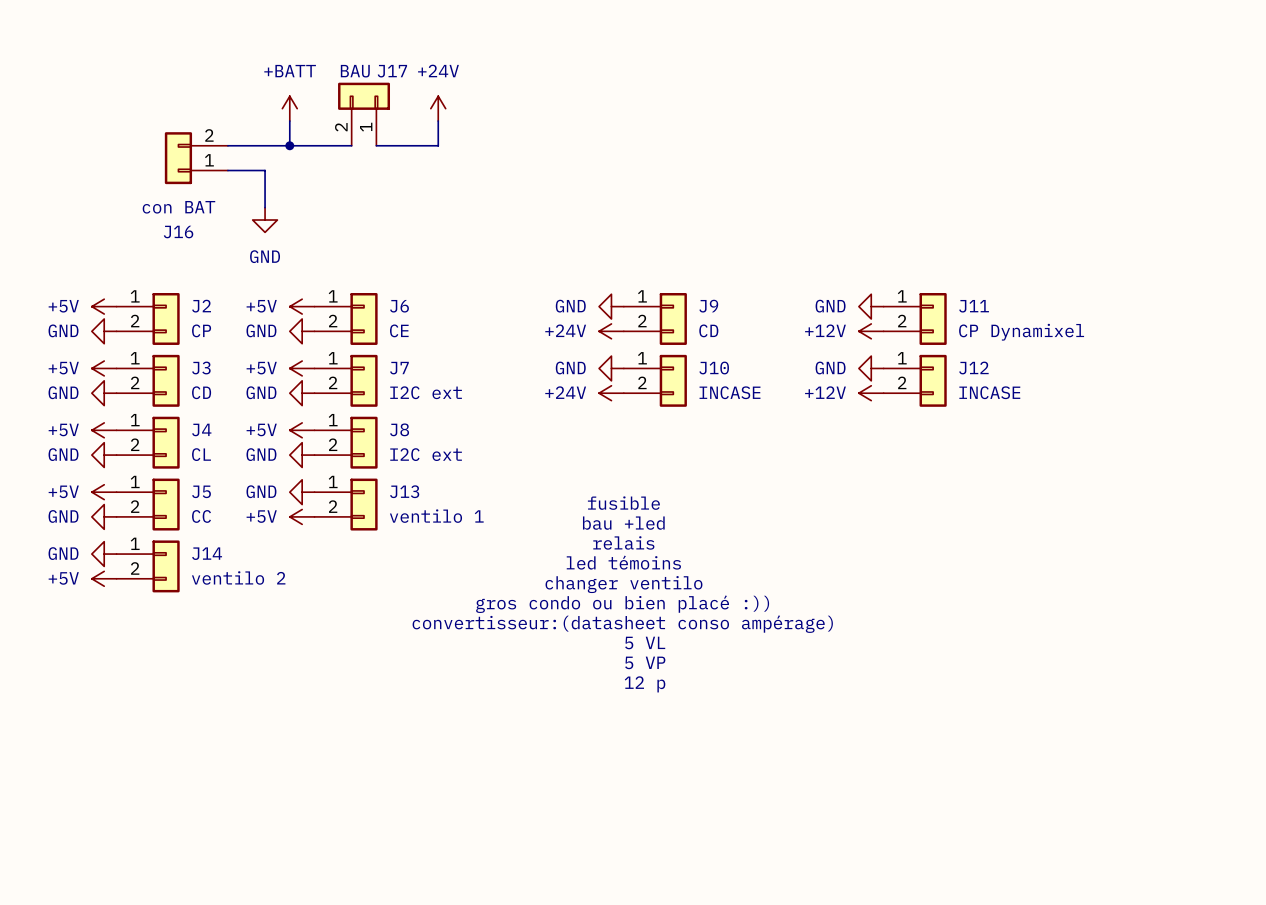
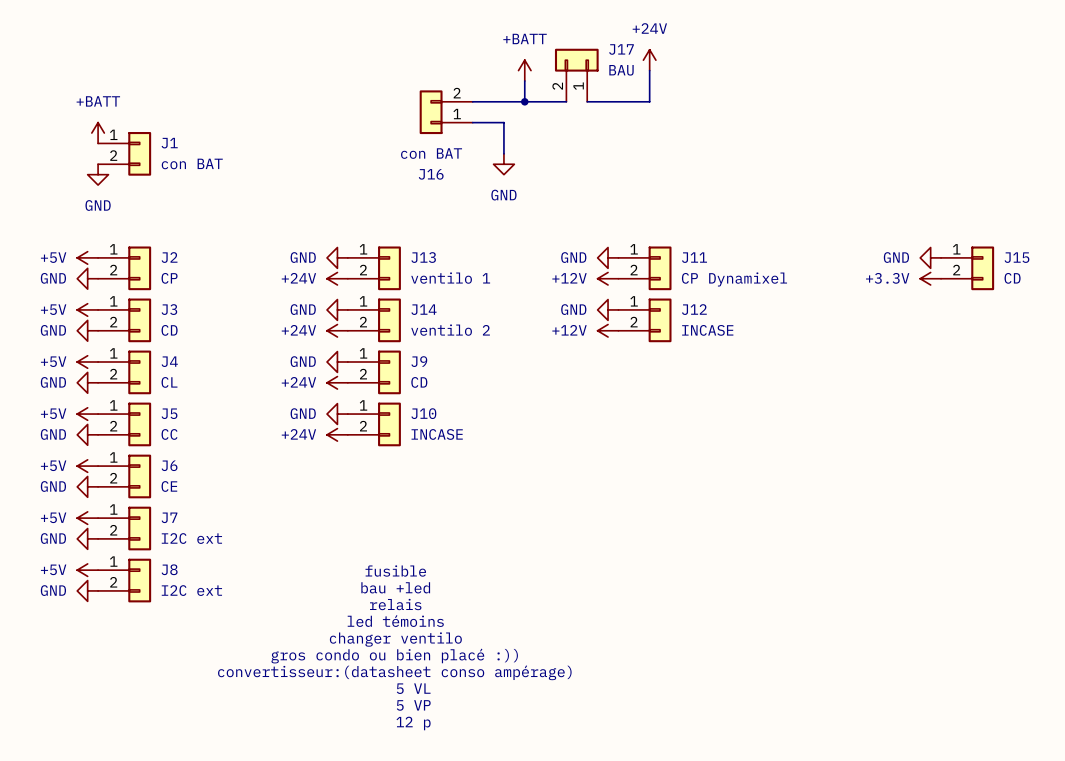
J17 value position: BAU (355, 71) -> BAU (621, 70)
J17 name position: J17 (392, 71) -> J17 (621, 49)
power symbol: none -> +24V (649, 60)
power symbol: none -> +BATT (524, 70)
wire: none -> (649, 70) (649, 101) (587, 101)
wire: none -> (524, 81) (524, 101)
power symbol: +BATT (289, 108) -> none
power symbol: +24V (438, 108) -> none
J17 position: (364, 114) -> (576, 75)
wire: (289, 121) (289, 145) -> none
wire: (438, 121) (438, 145) (376, 145) -> none
wire: none -> (472, 101) (566, 101)
junction: none -> (524, 101)
wire: (227, 145) (351, 145) -> none
junction: (289, 145) -> none
wire: none -> (472, 122) (503, 122) (503, 153)
power symbol: none -> +BATT (98, 133)
J16 position: (196, 158) -> (446, 112)
wire: (227, 170) (265, 170) (265, 207) -> none
J1: none -> con BAT (124, 153)
power symbol: none -> GND (503, 164)
power symbol: none -> GND (98, 174)
power symbol: GND (265, 220) -> none
power symbol: +5V (302, 306) -> none
power symbol: none -> GND (337, 257)
power symbol: GND (611, 306) -> none
power symbol: none -> GND (608, 257)
power symbol: GND (871, 306) -> none
power symbol: none -> GND (930, 257)
J6: CE (346, 318) -> none
J9 position: (655, 318) -> (374, 372)
J11 position: (915, 318) -> (644, 268)
J15: none -> CD (967, 268)
power symbol: GND (302, 331) -> none
power symbol: none -> +24V (337, 278)
power symbol: +24V (611, 331) -> none
power symbol: none -> +12V (608, 278)
power symbol: +12V (871, 331) -> none
power symbol: none -> +3.3V (930, 278)
power symbol: +5V (302, 368) -> none
power symbol: none -> GND (337, 309)
power symbol: GND (611, 368) -> none
power symbol: none -> GND (608, 309)
power symbol: GND (871, 368) -> none
J7 position: (346, 380) -> (124, 528)
J14: none -> ventilo 2 (374, 320)
J10 position: (655, 380) -> (374, 424)
J12 position: (915, 380) -> (644, 320)
power symbol: GND (302, 393) -> none
power symbol: none -> +24V (337, 330)
power symbol: +24V (611, 393) -> none
power symbol: none -> +12V (608, 330)
power symbol: +12V (871, 393) -> none
power symbol: +5V (302, 430) -> none
power symbol: none -> GND (337, 361)
J8 position: (346, 442) -> (124, 580)
power symbol: GND (302, 455) -> none
power symbol: none -> +24V (337, 382)
power symbol: GND (302, 492) -> none
power symbol: none -> GND (337, 414)
text position: fusible (623, 503) -> fusible (395, 571)
J13 position: (346, 504) -> (374, 268)
power symbol: +5V (302, 516) -> none
power symbol: none -> +24V (337, 434)
text position: bau +led (623, 523) -> bau +led (395, 587)
text position: relais (623, 542) -> relais (395, 604)
J14 name: J14 (207, 553) -> J6 (169, 465)
power symbol: GND (104, 554) -> +5V (87, 466)
text position: led témoins (623, 562) -> led témoins (395, 621)
J14 value: ventilo 2 (238, 577) -> CE (169, 486)
power symbol: +5V (104, 578) -> GND (87, 486)
text position: changer ventilo (623, 584) -> changer ventilo (395, 639)
text position: gros condo ou bien placé :)) (622, 604) -> gros condo ou bien placé :)) (394, 656)
power symbol: none -> +5V (87, 518)
text position: convertisseur:(datasheet conso ampérage) (622, 624) -> convertisseur:(datasheet conso ampérage) (394, 672)
power symbol: none -> GND (87, 538)
text position: 5 VL (645, 642) -> 5 VL (413, 688)
text position: 5 VP (645, 662) -> 5 VP (413, 705)
power symbol: none -> +5V (87, 570)
text position: 12 p (645, 684) -> 12 p (413, 723)
power symbol: none -> GND (87, 590)

